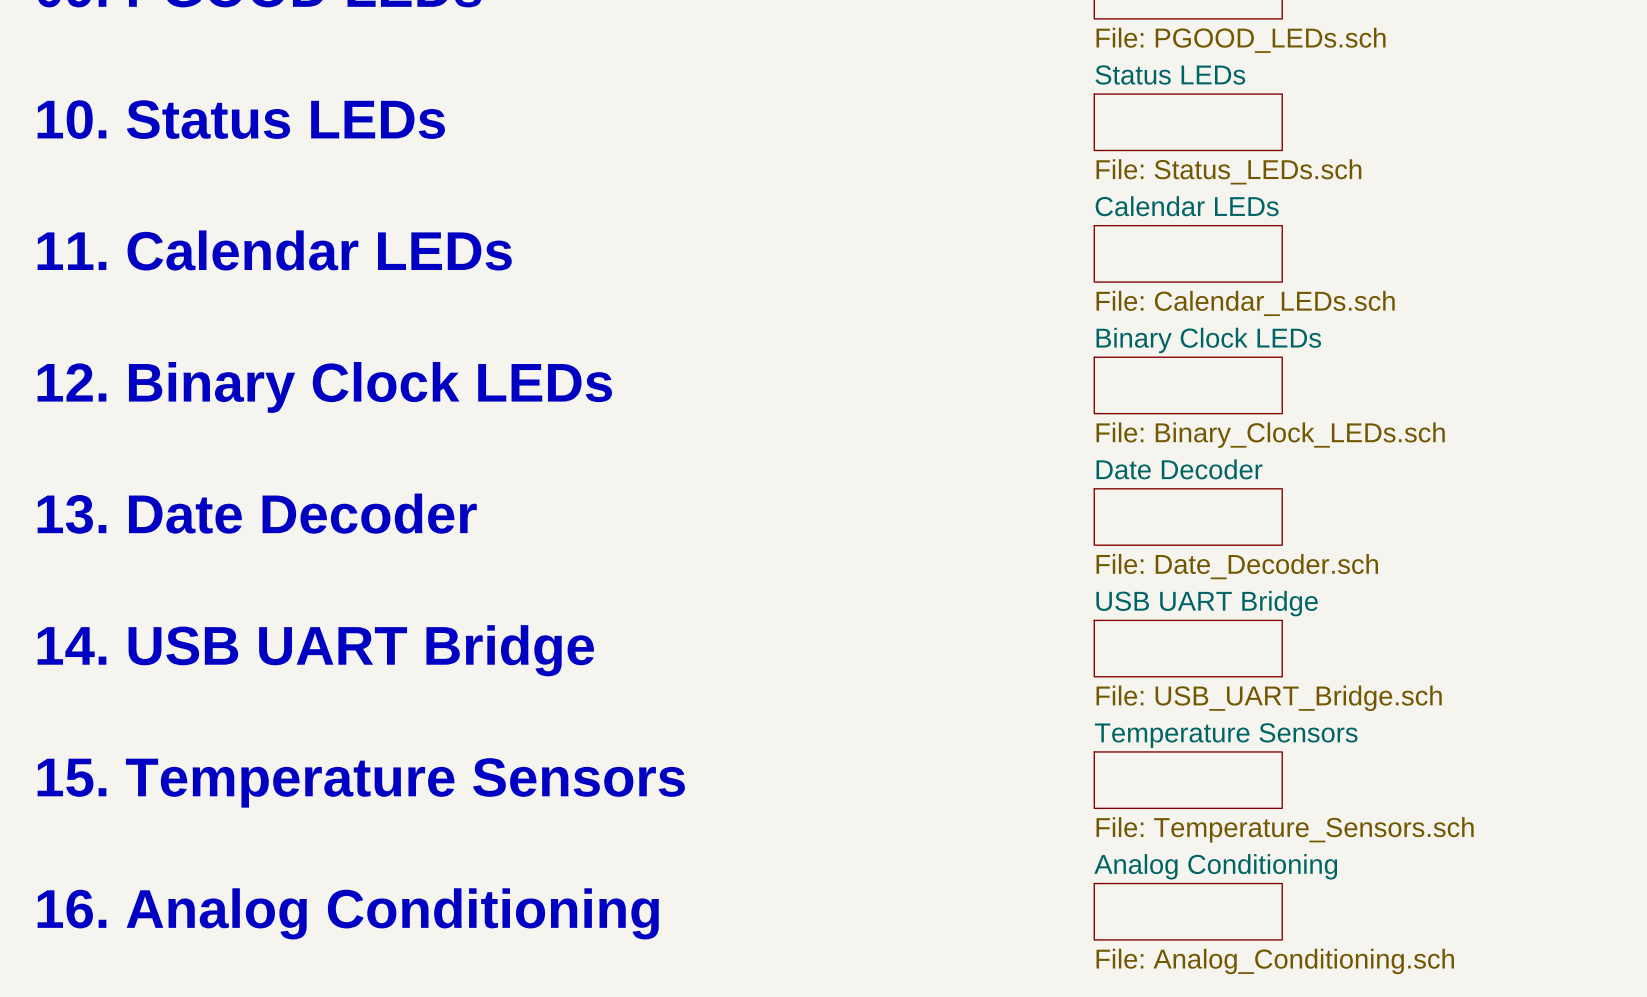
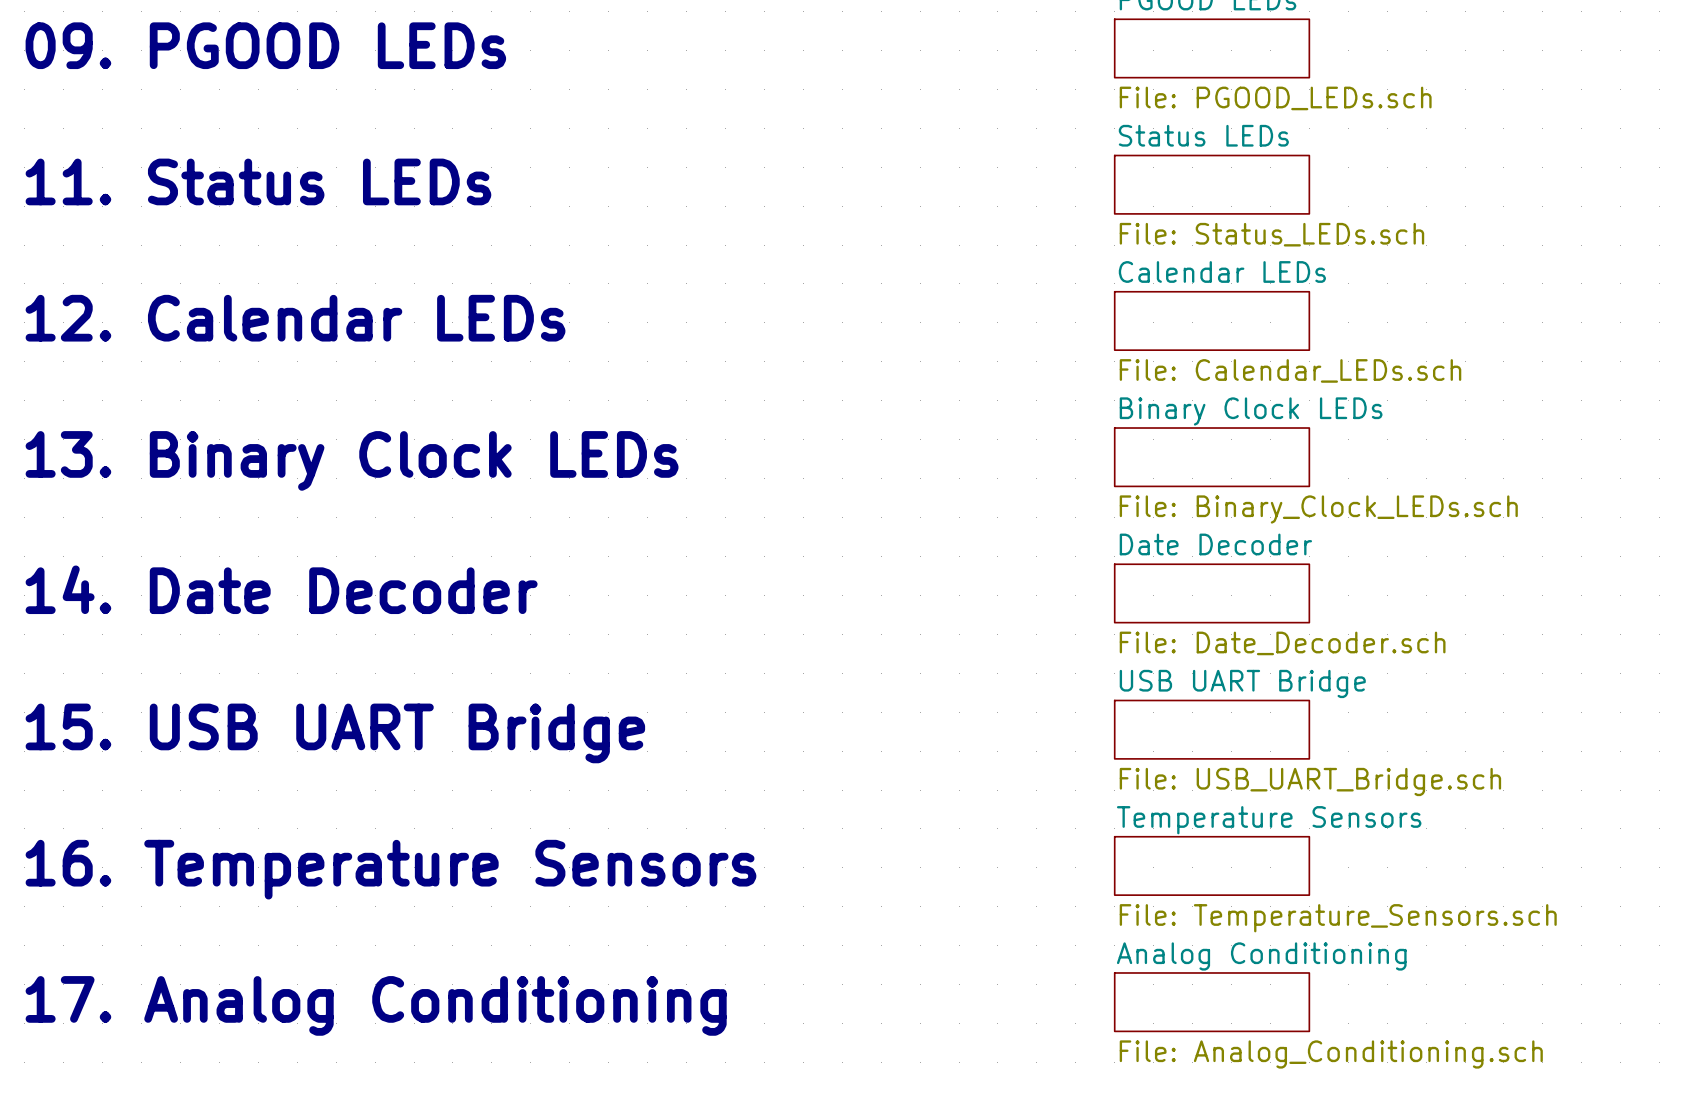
text: 10. Status LEDs (241, 119) -> 11. Status LEDs (258, 181)
text: 11. Calendar LEDs (274, 250) -> 12. Calendar LEDs (295, 318)
text: 12. Binary Clock LEDs (324, 387) -> 13. Binary Clock LEDs (352, 460)
text: 13. Date Decoder (257, 513) -> 14. Date Decoder (281, 589)
text: 14. USB UART Bridge (315, 650) -> 15. USB UART Bridge (335, 733)
text: 15. Temperature Sensors (361, 782) -> 16. Temperature Sensors (390, 869)
text: 16. Analog Conditioning (348, 913) -> 17. Analog Conditioning (376, 1005)

